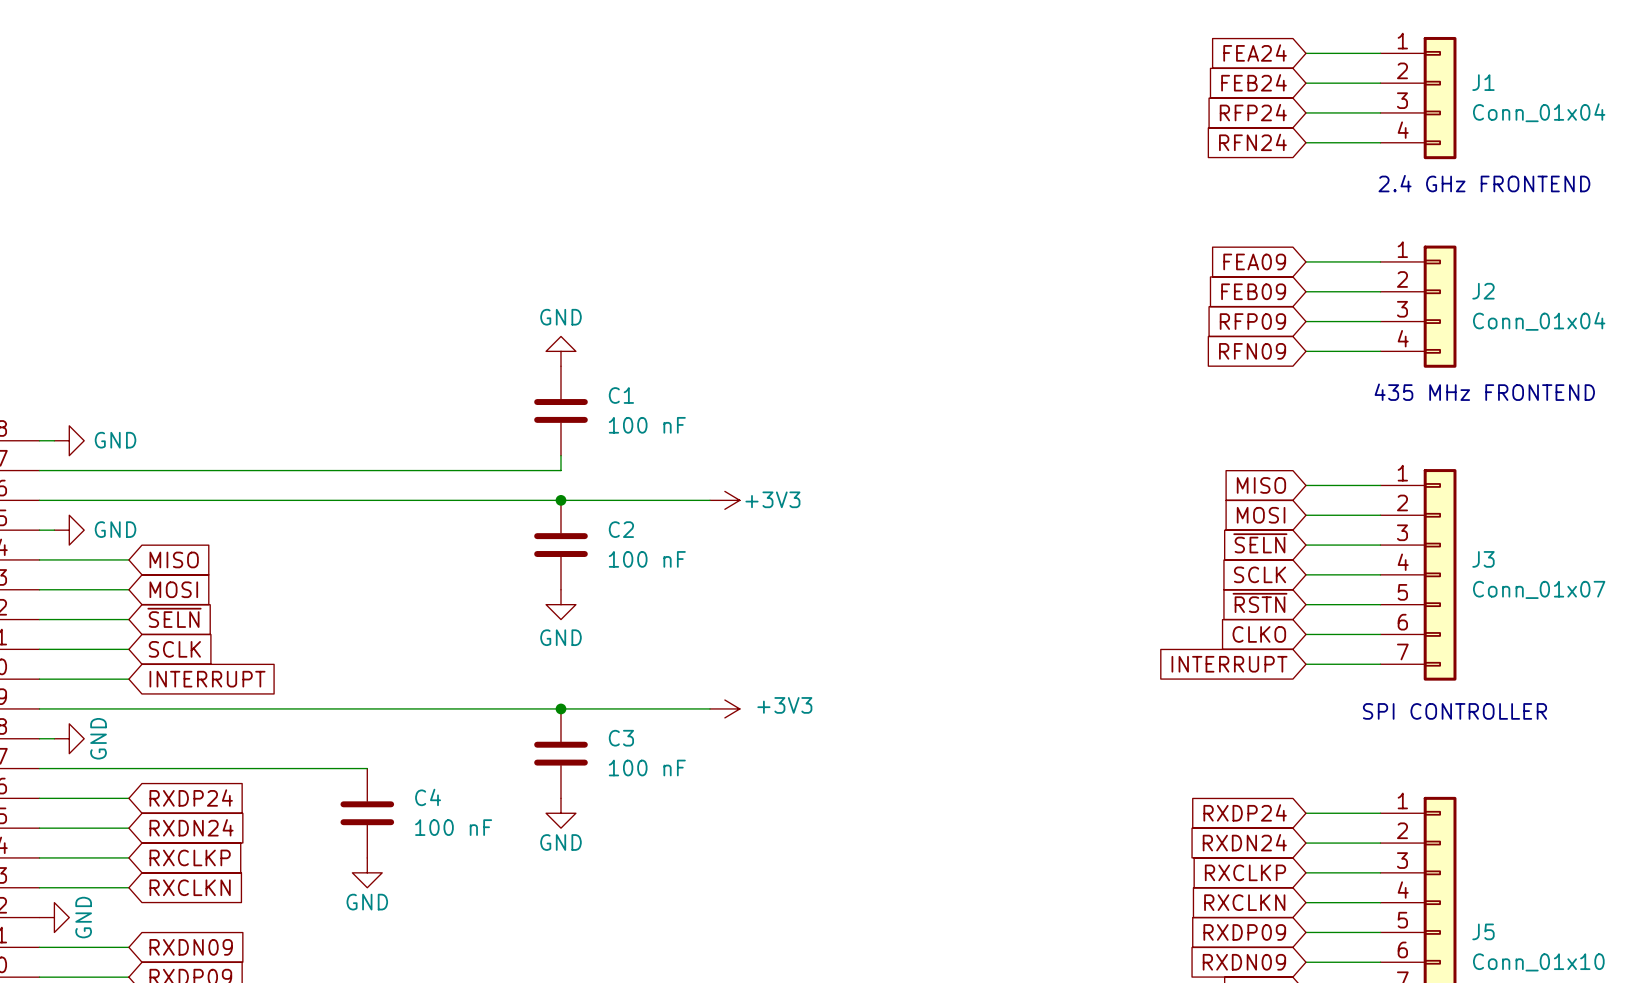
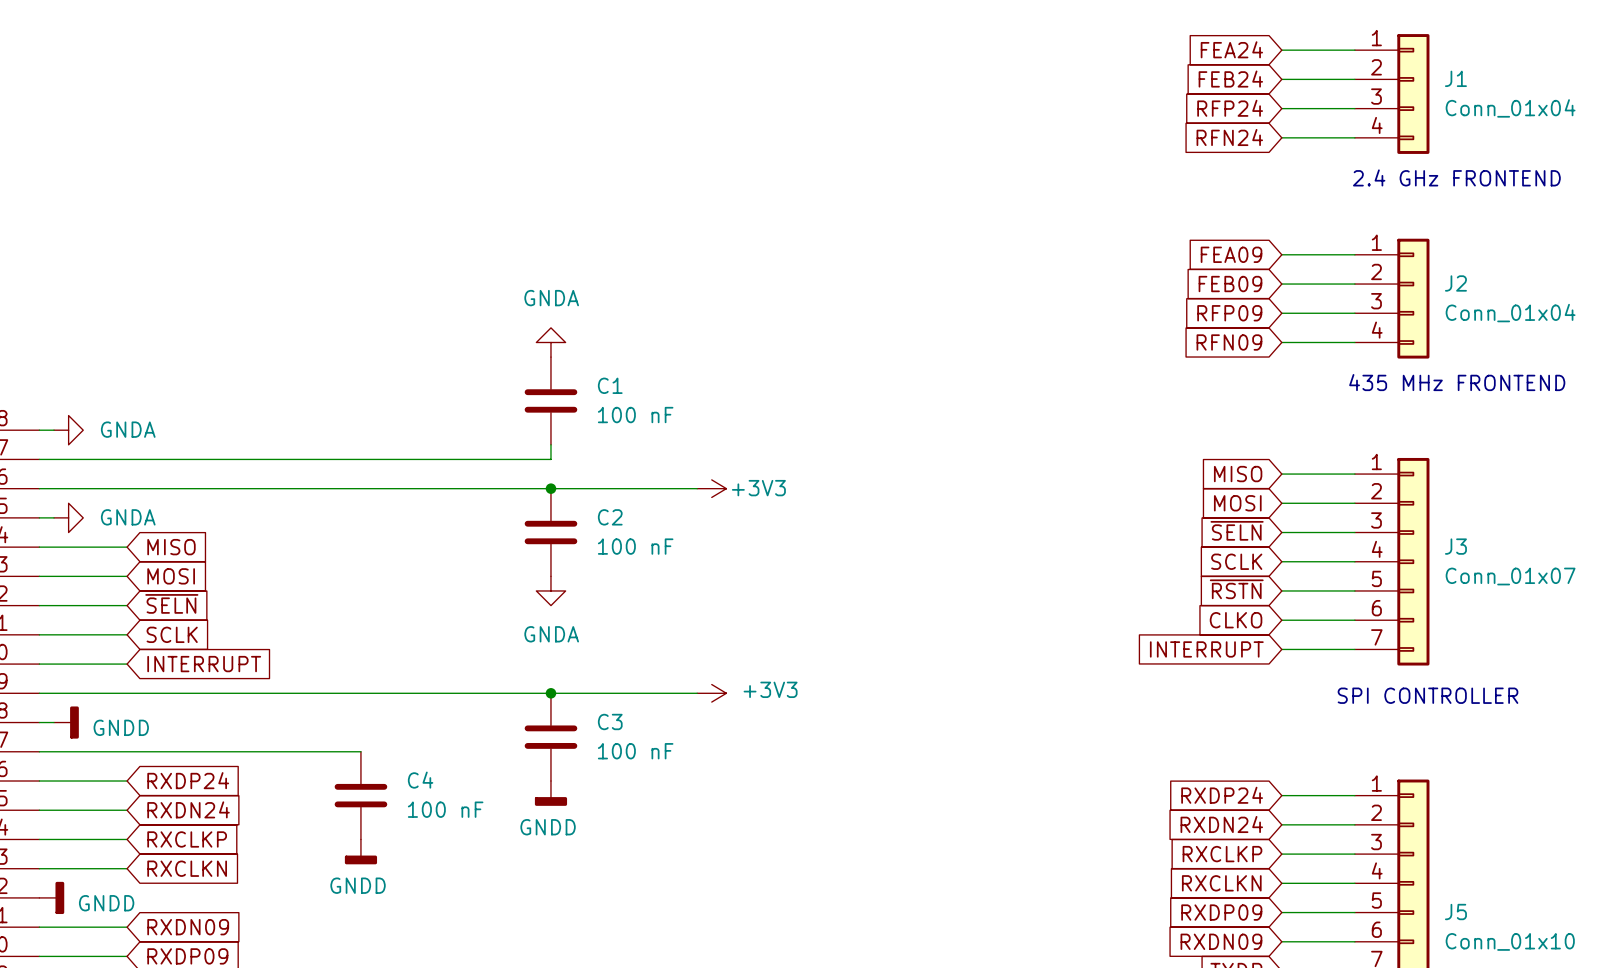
power symbol: GND (560, 351) -> GNDA (550, 342)
power symbol: GND (69, 440) -> GNDA (68, 430)
power symbol: GND (69, 530) -> GNDA (68, 517)
power symbol: GND (560, 604) -> GNDA (550, 590)
power symbol: GND (69, 738) -> GNDD (66, 722)
power symbol: GND (560, 813) -> GNDD (550, 793)
power symbol: GND (367, 872) -> GNDD (360, 851)
power symbol: GND (54, 917) -> GNDD (51, 897)

